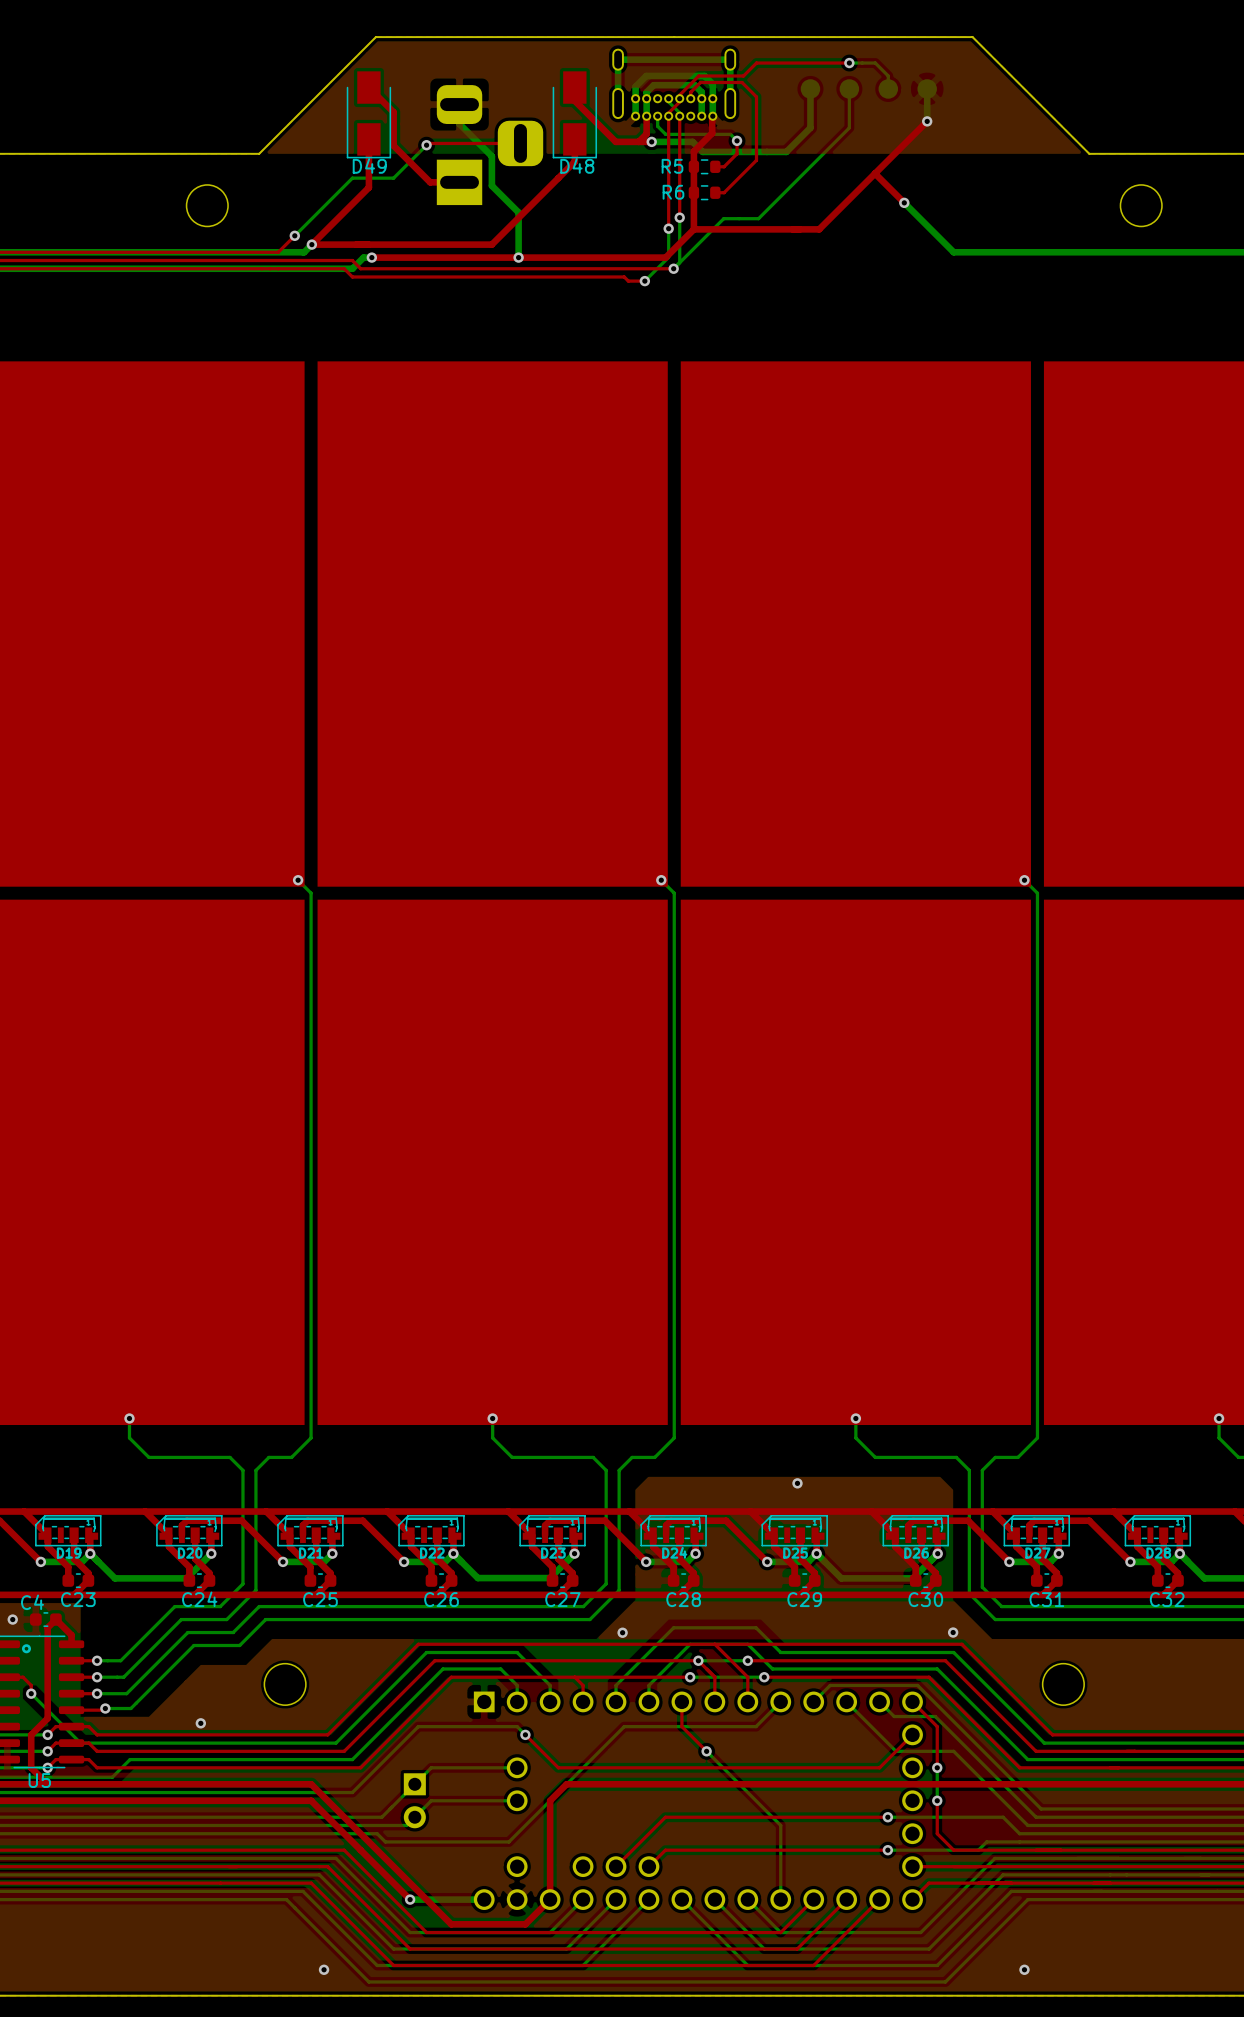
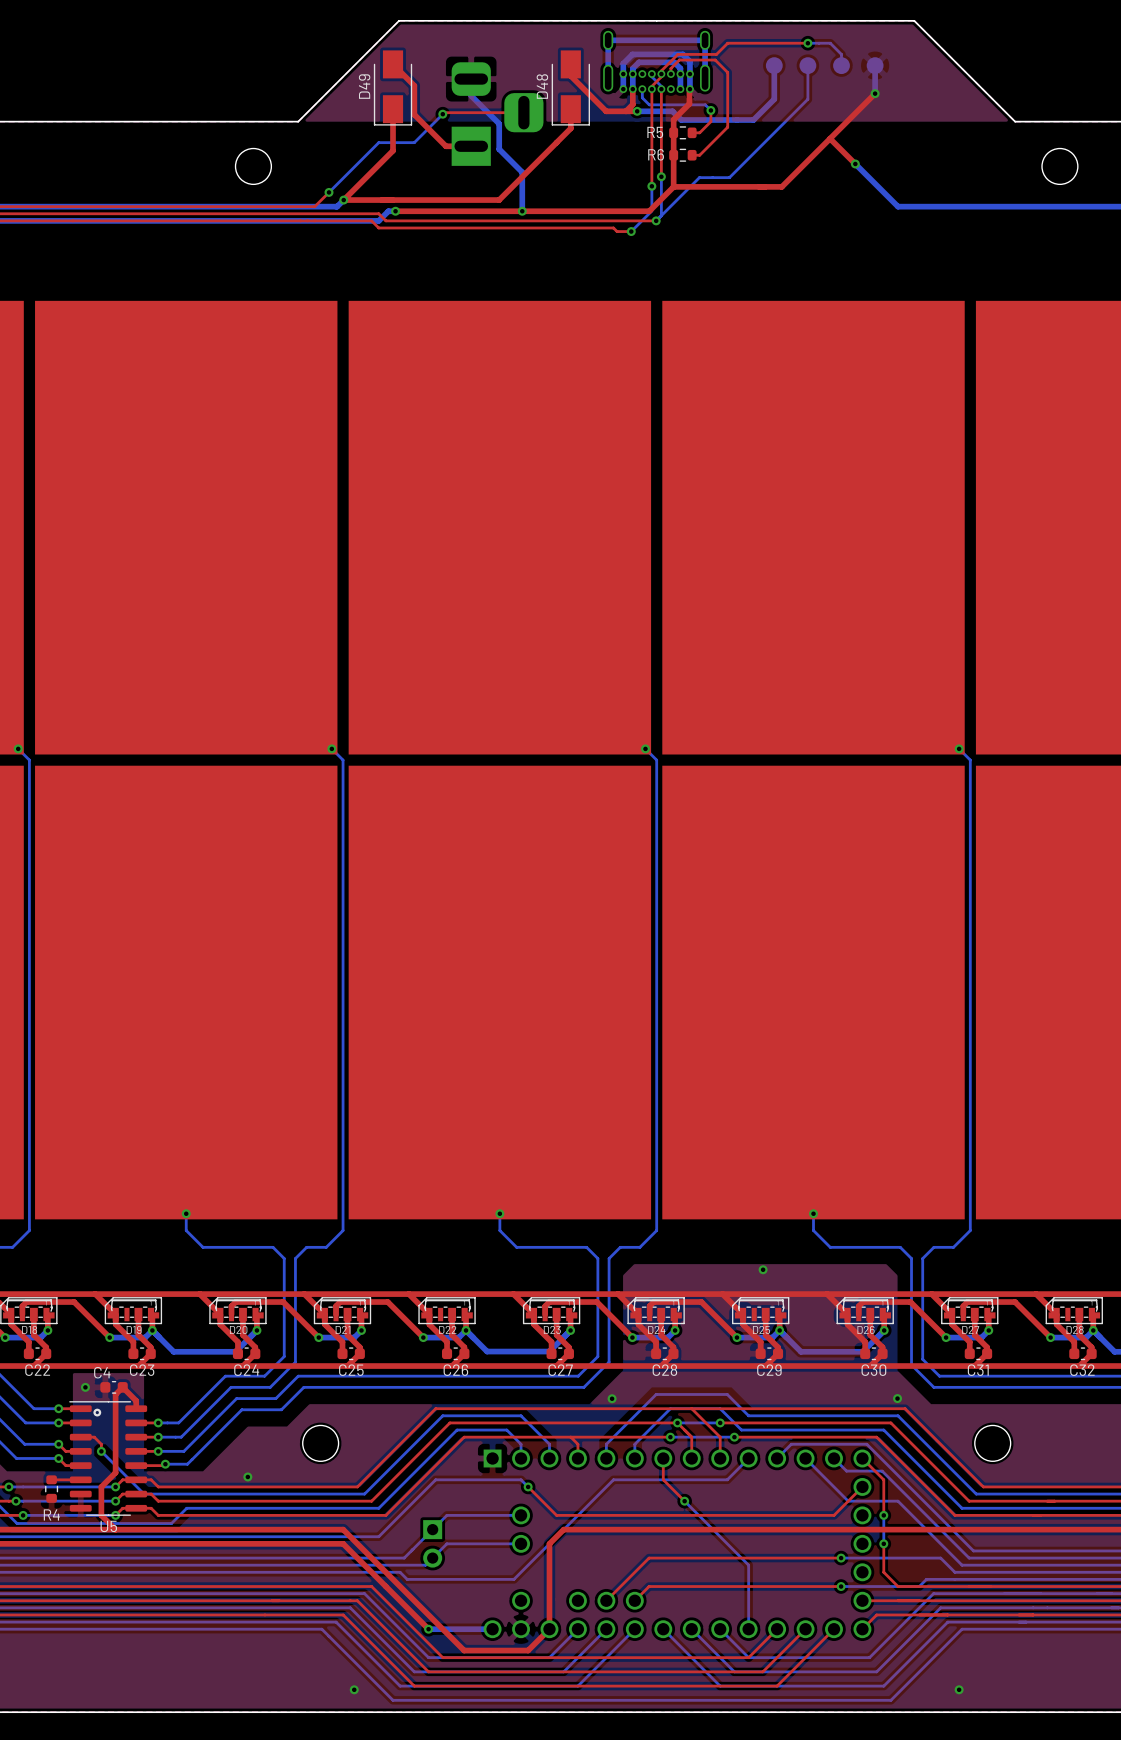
D49 name rotation: 0° (369, 166) -> 90° counterclockwise (364, 86)
D49 name position: D49 (369, 166) -> D49 (364, 86)
D48 name rotation: 0° (577, 166) -> 90° counterclockwise (542, 86)
D48 name position: D48 (577, 166) -> D48 (542, 86)

